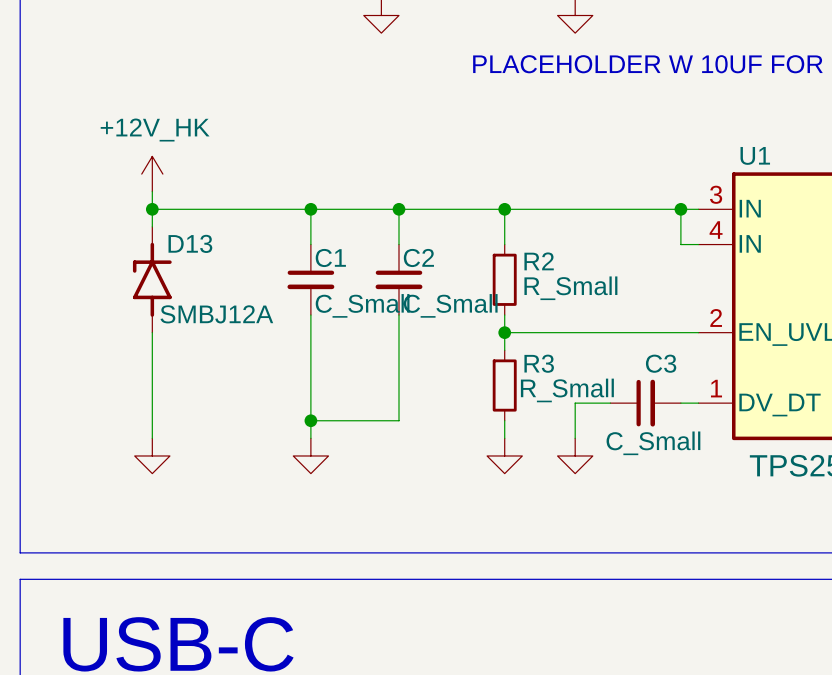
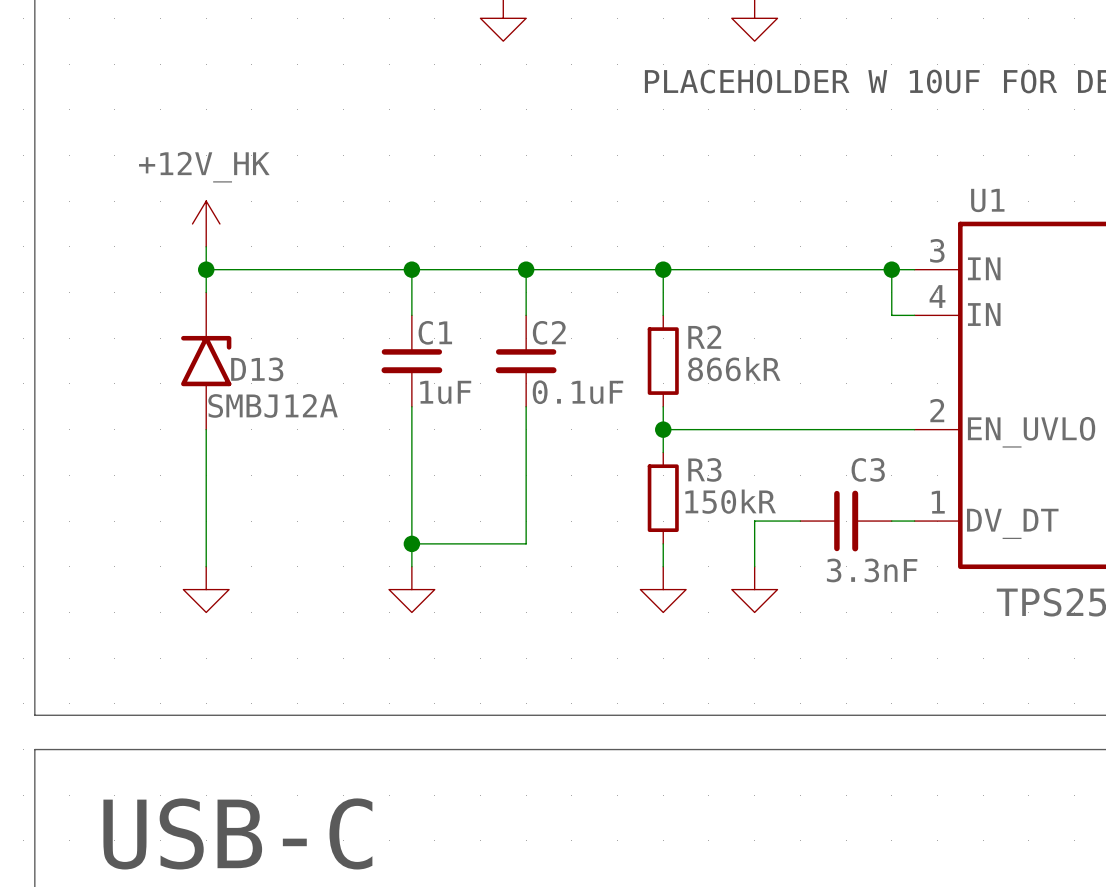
D13 symbol: [132, 226, 172, 333] -> [181, 292, 232, 430]
D13 name position: D13 (190, 243) -> D13 (257, 369)
R2 value: R_Small (570, 288) -> 866kR (734, 369)
C1 value: C_Small (362, 305) -> 1uF (445, 392)
C2 value: C_Small (450, 305) -> 0.1uF (577, 392)
R3 value: R_Small (567, 390) -> 150kR (730, 501)
C3 value: C_Small (653, 443) -> 3.3nF (872, 570)

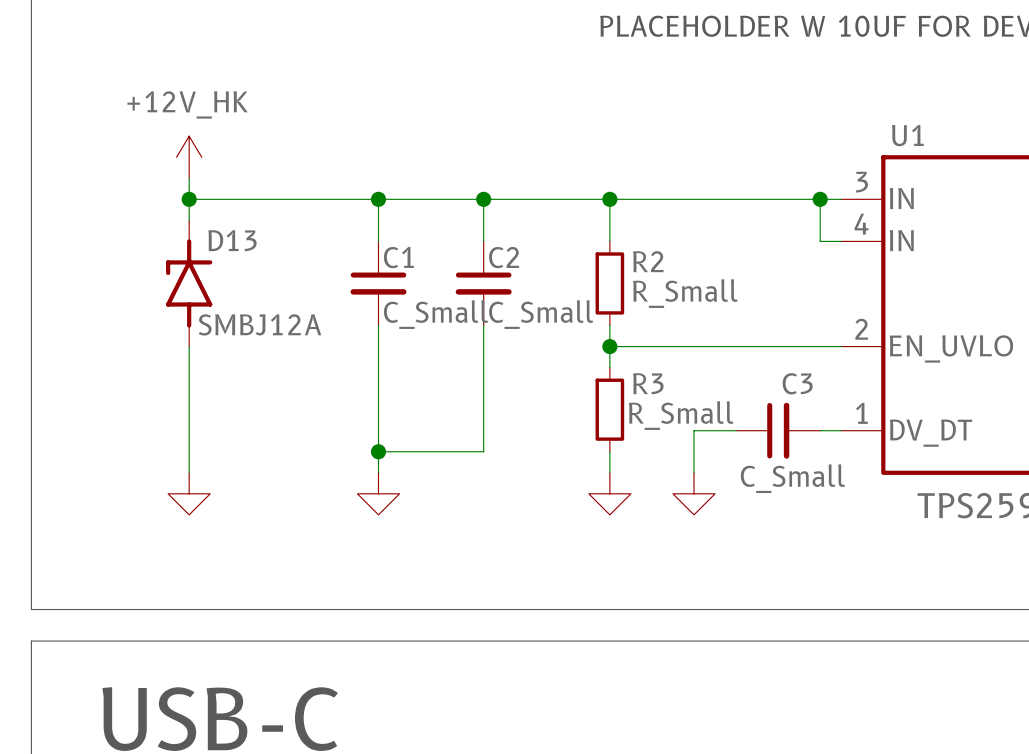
D13 symbol: [181, 292, 232, 430] -> [166, 220, 213, 347]
D13 name position: D13 (257, 369) -> D13 (232, 240)
R2 value: 866kR (734, 369) -> R_Small (685, 293)
C1 value: 1uF (445, 392) -> C_Small (436, 314)
C2 value: 0.1uF (577, 392) -> C_Small (541, 314)
R3 value: 150kR (730, 501) -> R_Small (681, 415)
C3 value: 3.3nF (872, 570) -> C_Small (792, 478)

